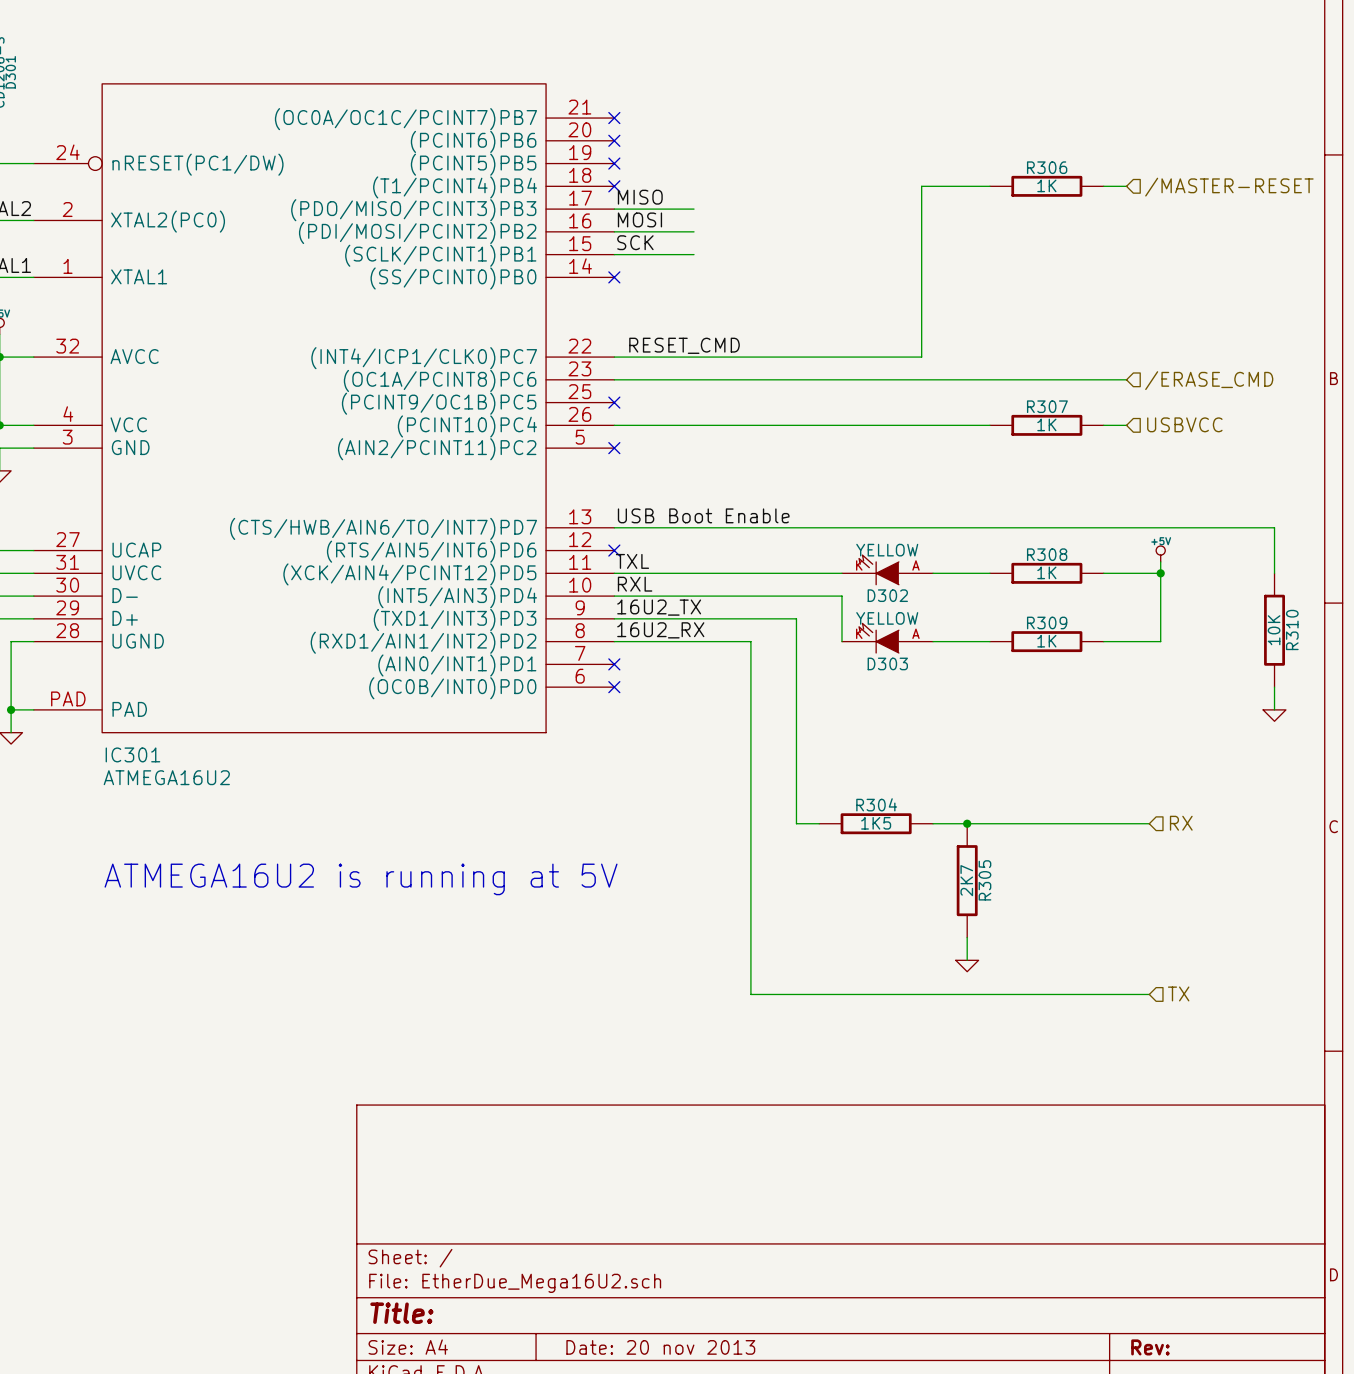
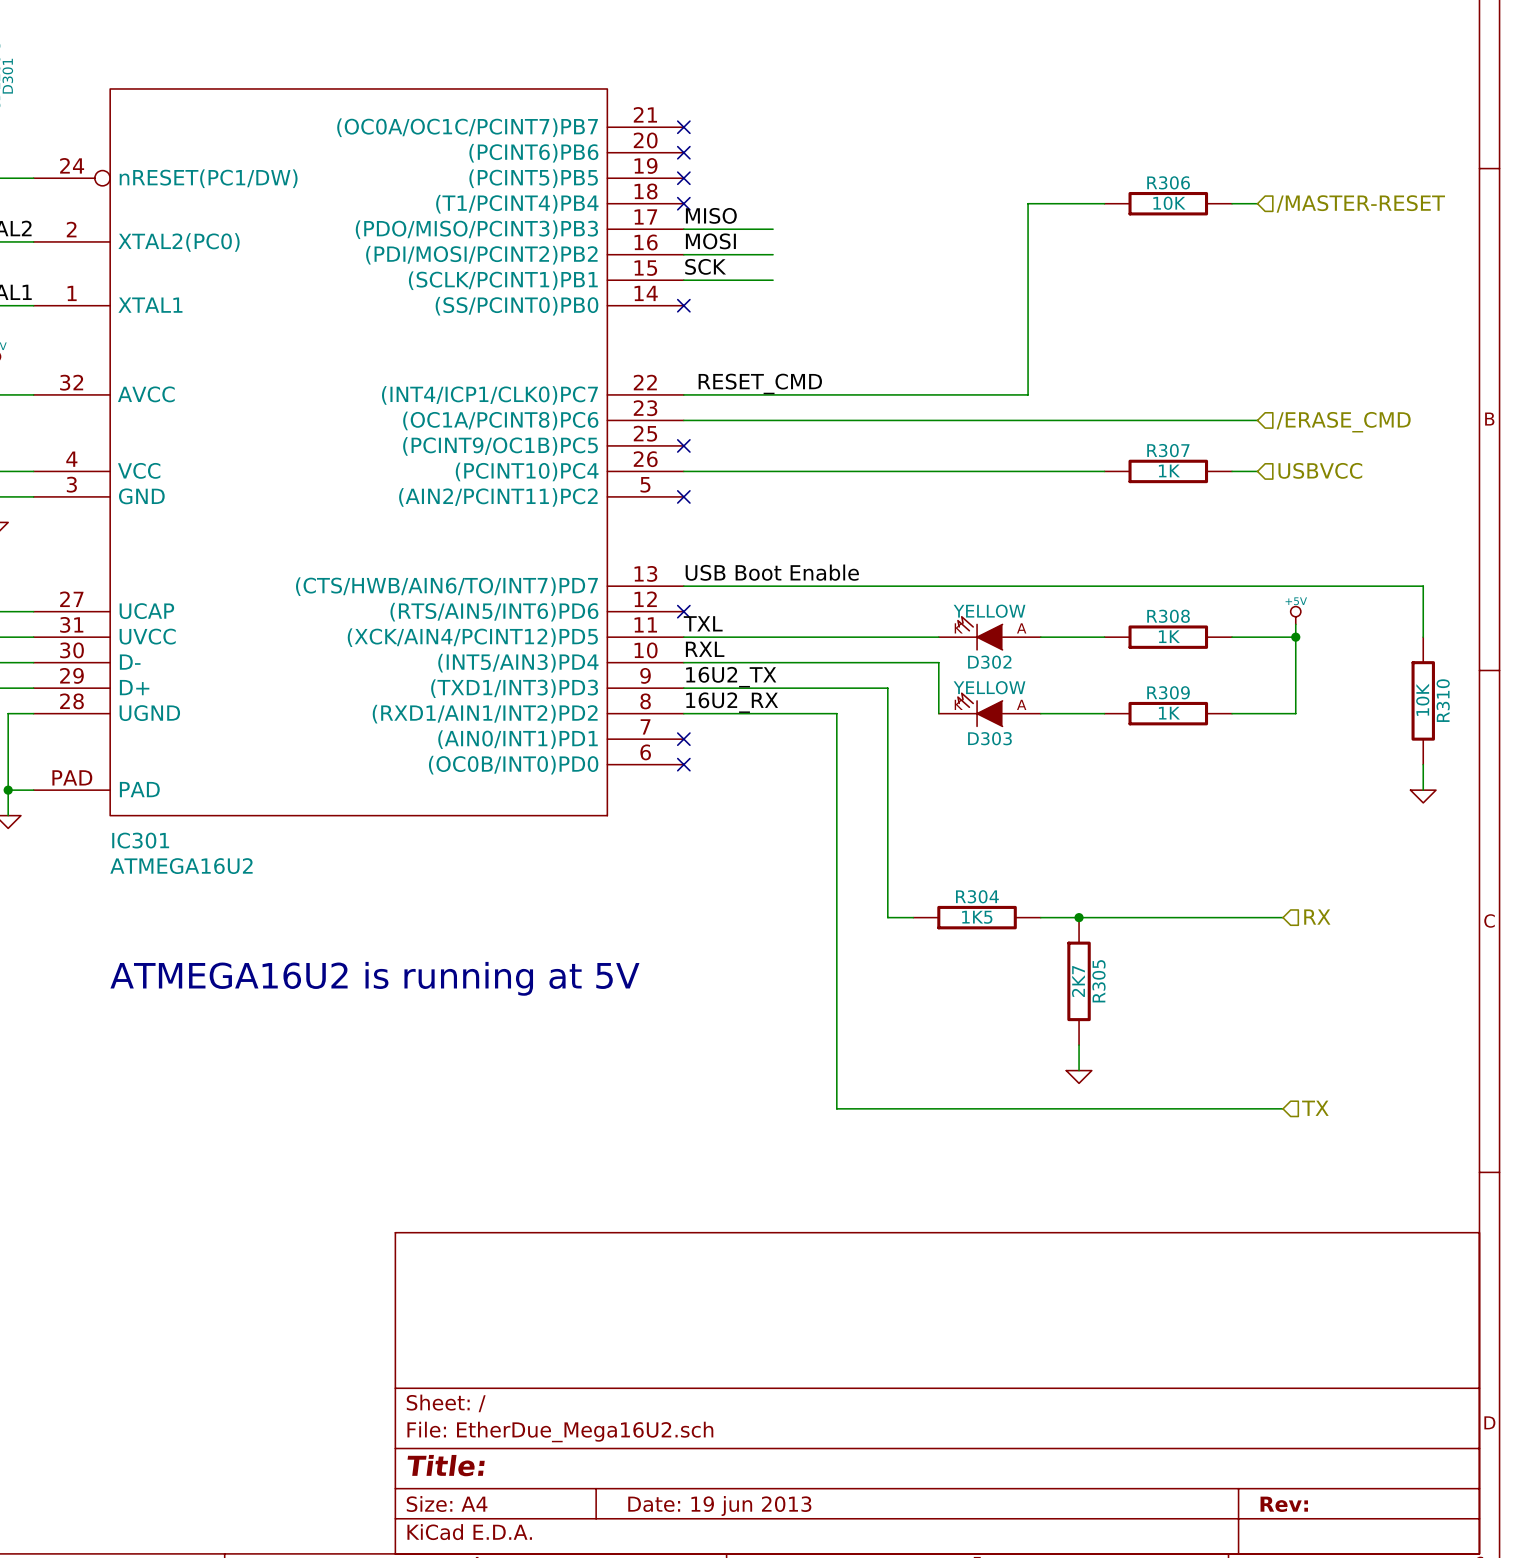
R306 value: 1K (1046, 185) -> 10K (1169, 203)
title block: Date: 20 nov 2013 (660, 1347) -> Date: 19 jun 2013 (719, 1505)

